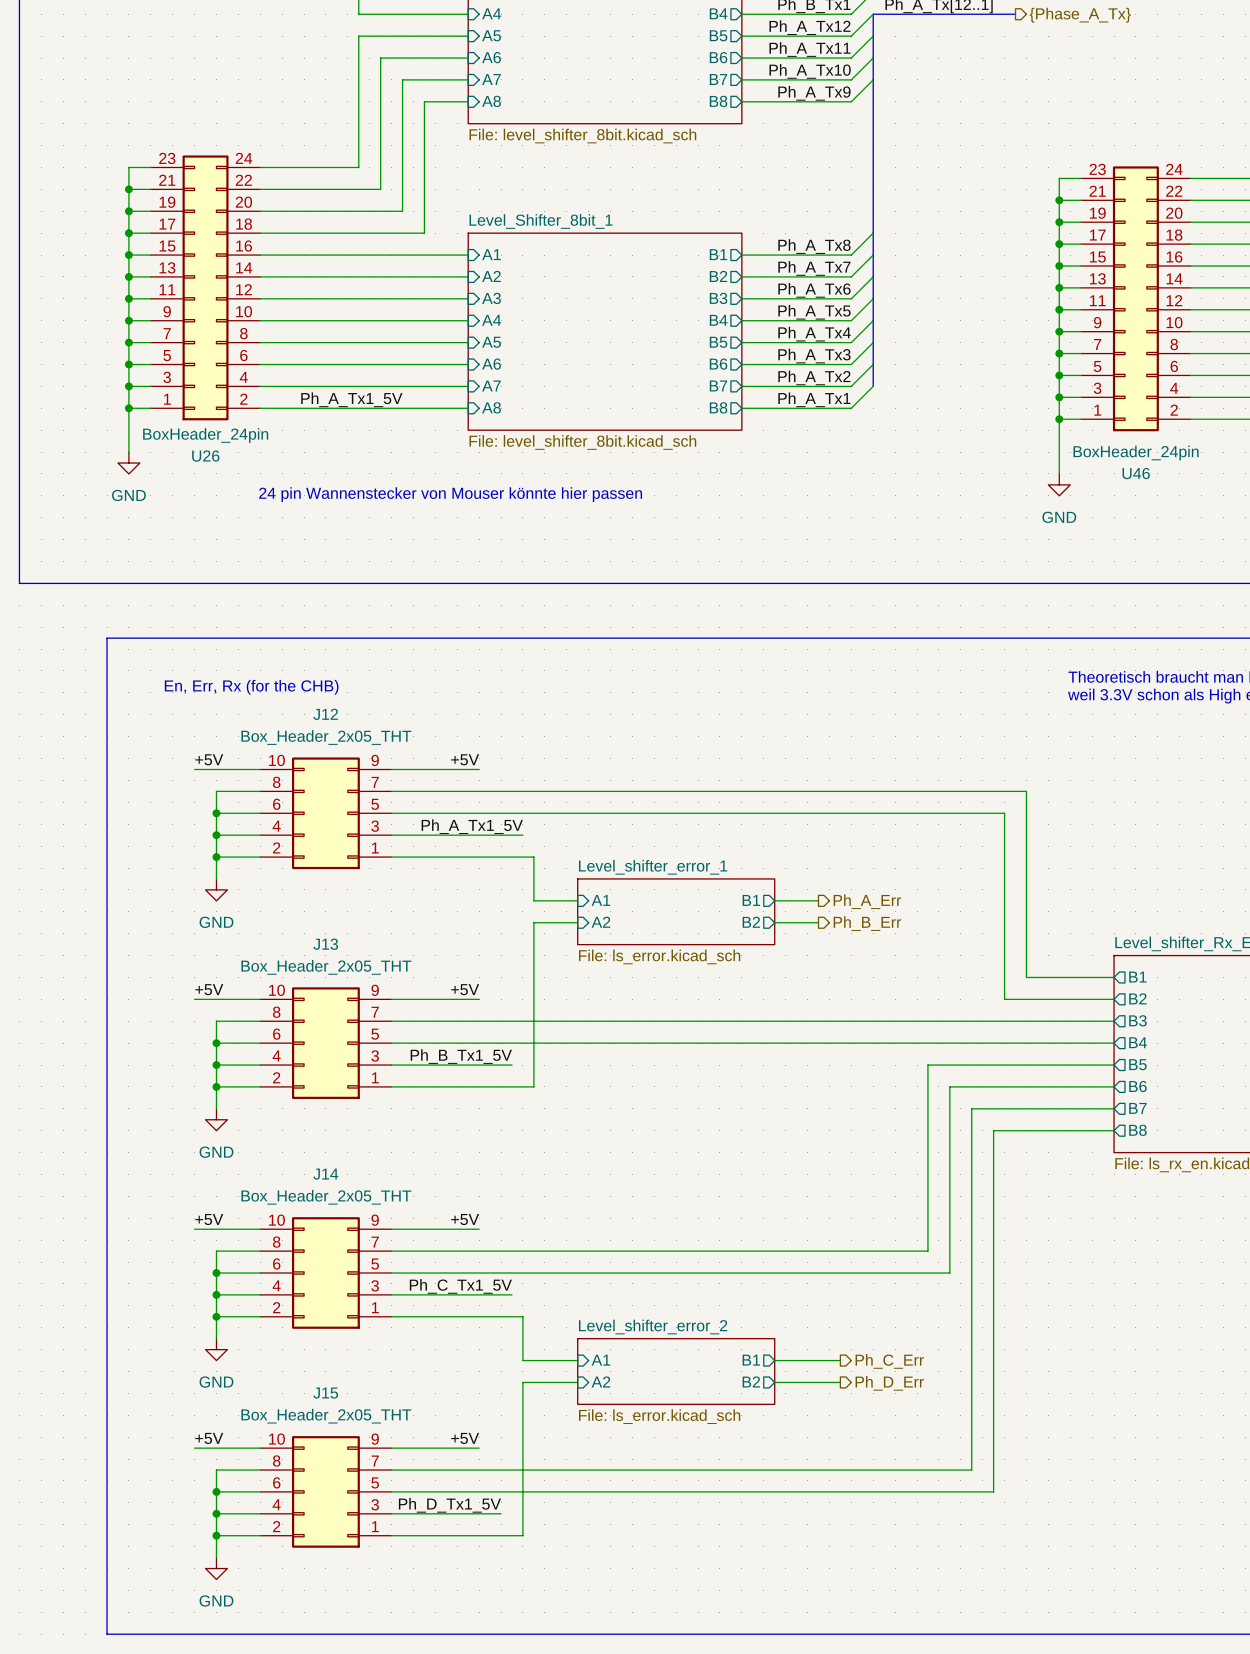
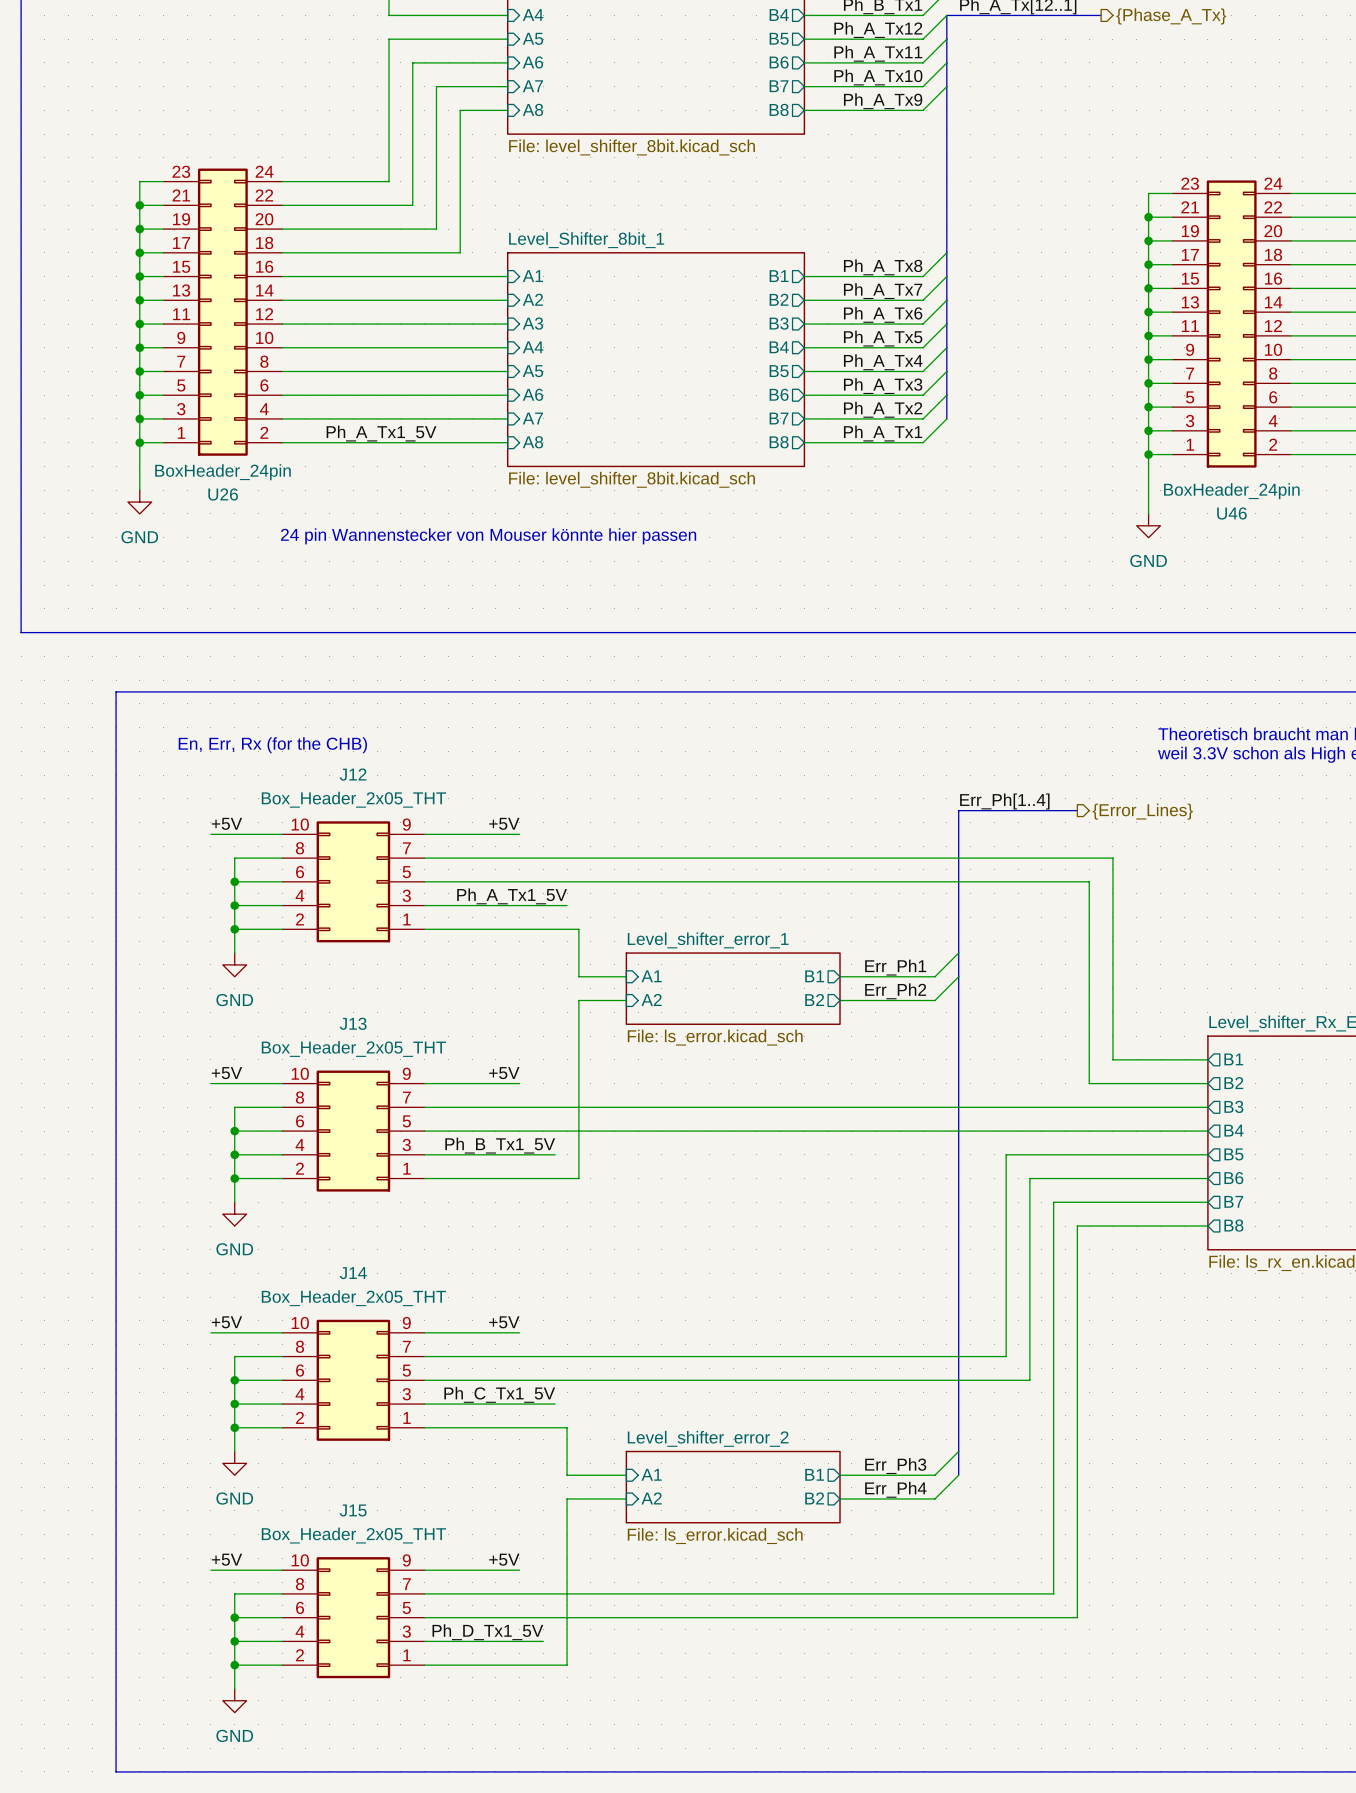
label: none -> Err_Ph[1..4] (1004, 801)
bus: none -> (1077, 810) (958, 810) (958, 1475)
hierarchical label: none -> {Error_Lines} (1142, 811)
wire: none -> (958, 953) (934, 976) (887, 976)
label: none -> Err_Ph1 (895, 967)
wire: none -> (958, 976) (934, 1000) (887, 1000)
hierarchical label: Ph_A_Err (867, 901) -> none
label: none -> Err_Ph2 (895, 991)
hierarchical label: Ph_B_Err (867, 923) -> none
wire: none -> (958, 1451) (934, 1475) (911, 1475)
label: none -> Err_Ph3 (895, 1466)
wire: none -> (958, 1475) (934, 1498) (911, 1498)
hierarchical label: Ph_C_Err (889, 1361) -> none
label: none -> Err_Ph4 (895, 1489)
hierarchical label: Ph_D_Err (889, 1383) -> none

